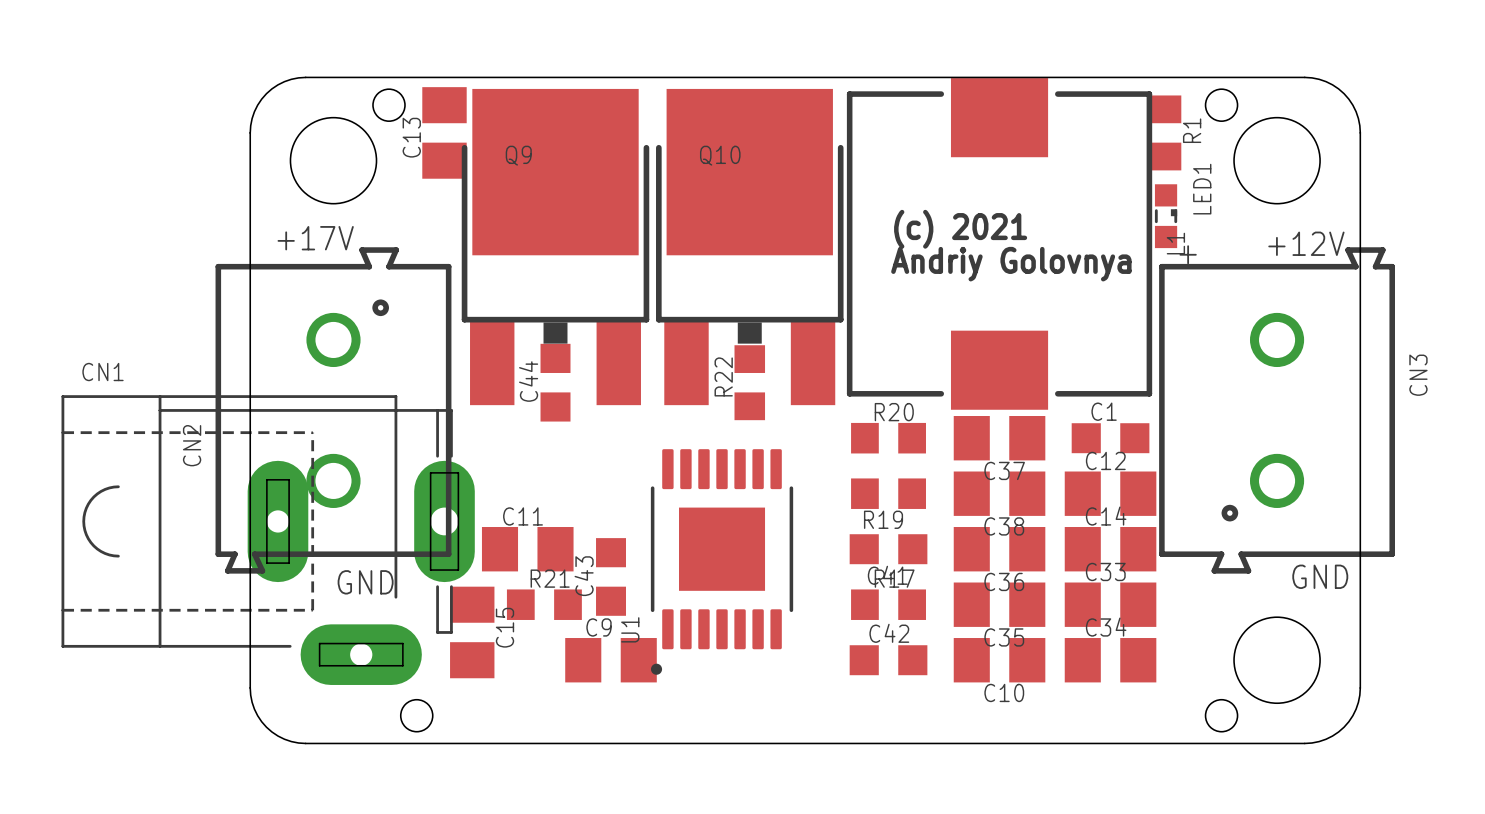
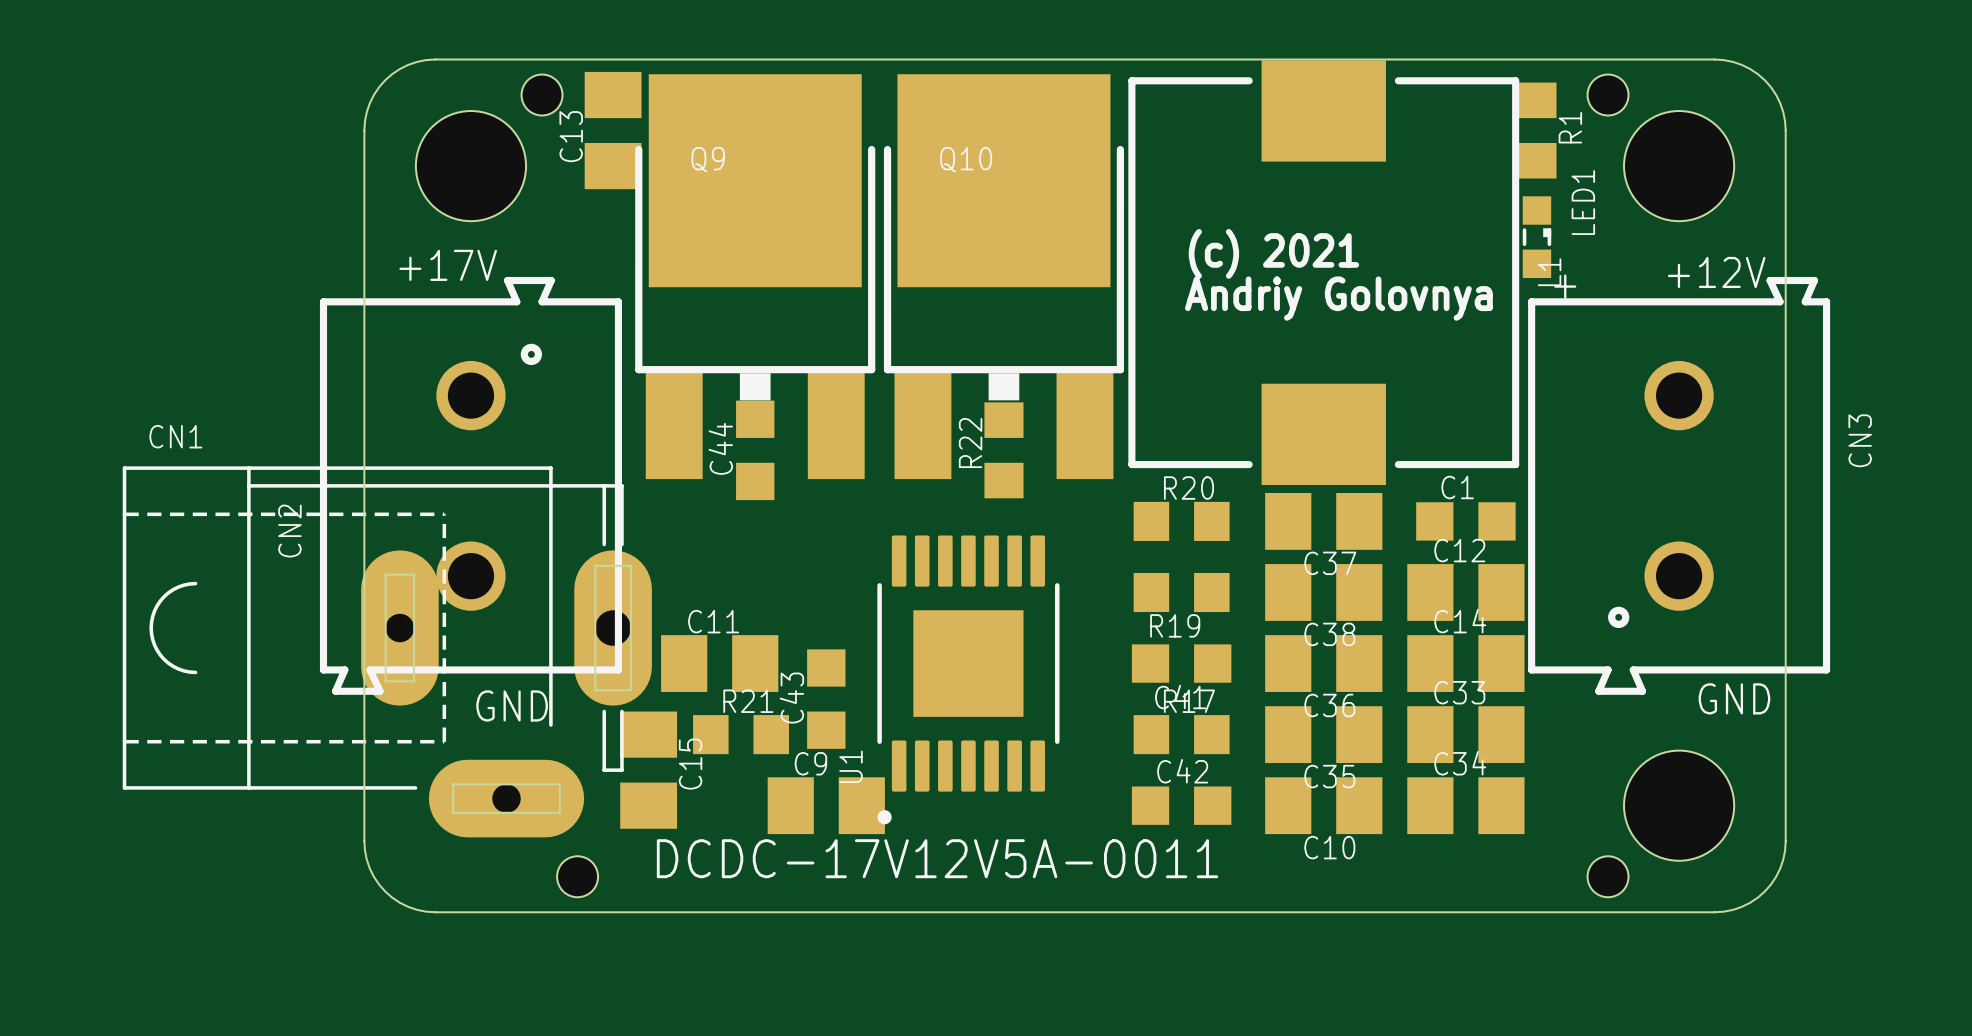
text: none -> DCDC-17V12V5A-0011 (937, 858)

